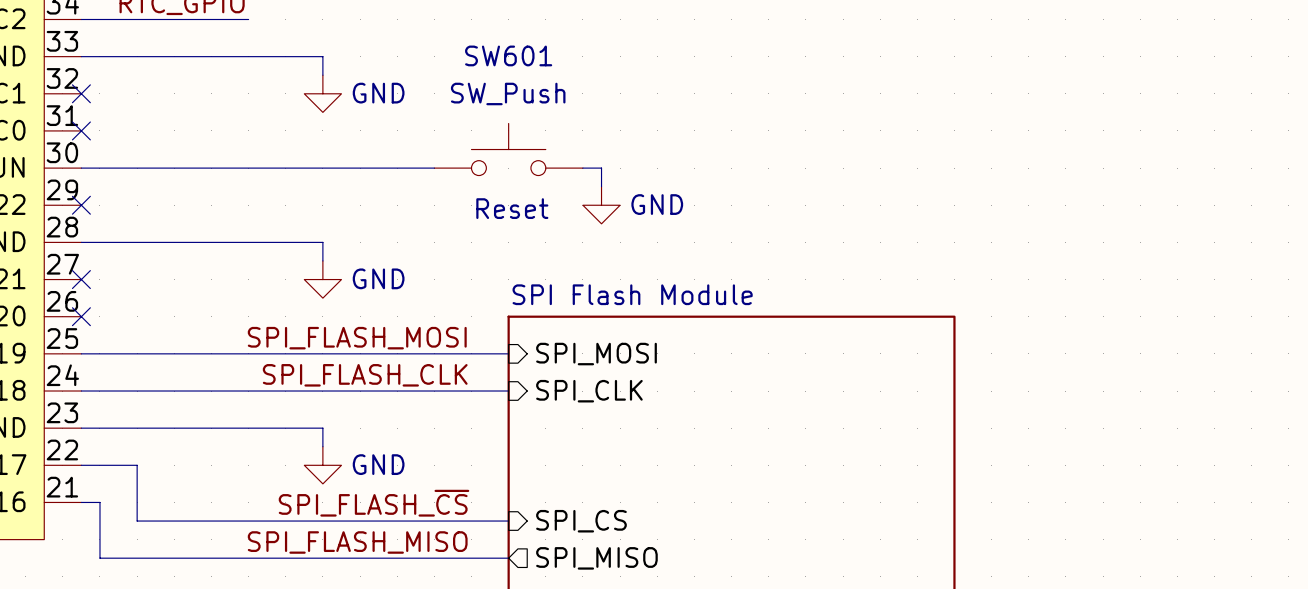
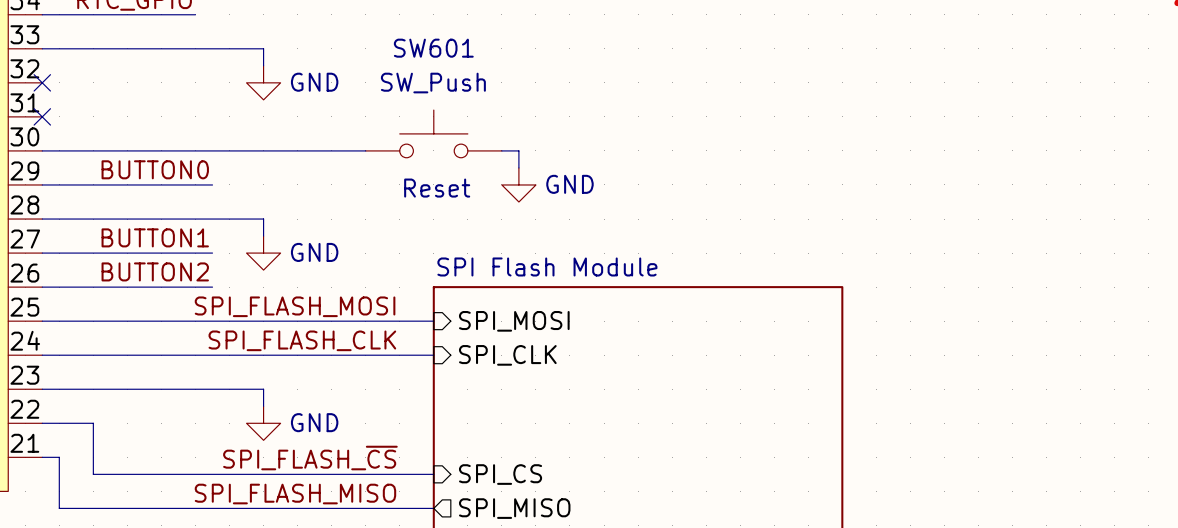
label: none -> BUTTON0 (155, 169)
wire: none -> (42, 184) (212, 184)
no-connect mark: (81, 205) -> none
label: none -> BUTTON1 (155, 237)
wire: none -> (42, 253) (212, 253)
no-connect mark: (81, 279) -> none
label: none -> BUTTON2 (155, 271)
wire: none -> (42, 287) (212, 287)
no-connect mark: (81, 316) -> none

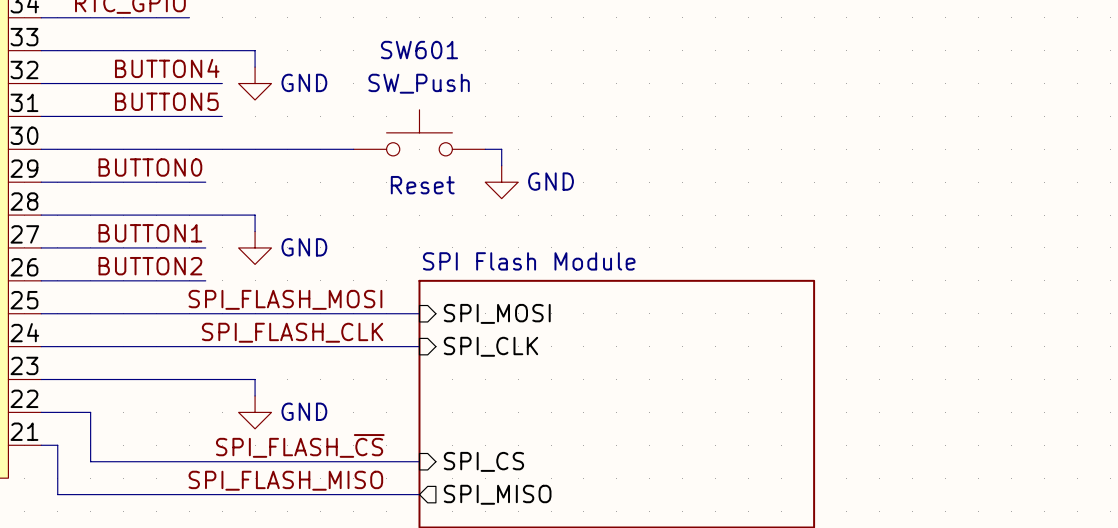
label: none -> BUTTON4 (167, 68)
wire: none -> (41, 83) (222, 83)
no-connect mark: (42, 82) -> none
label: none -> BUTTON5 (166, 101)
wire: none -> (41, 116) (222, 116)
no-connect mark: (42, 116) -> none

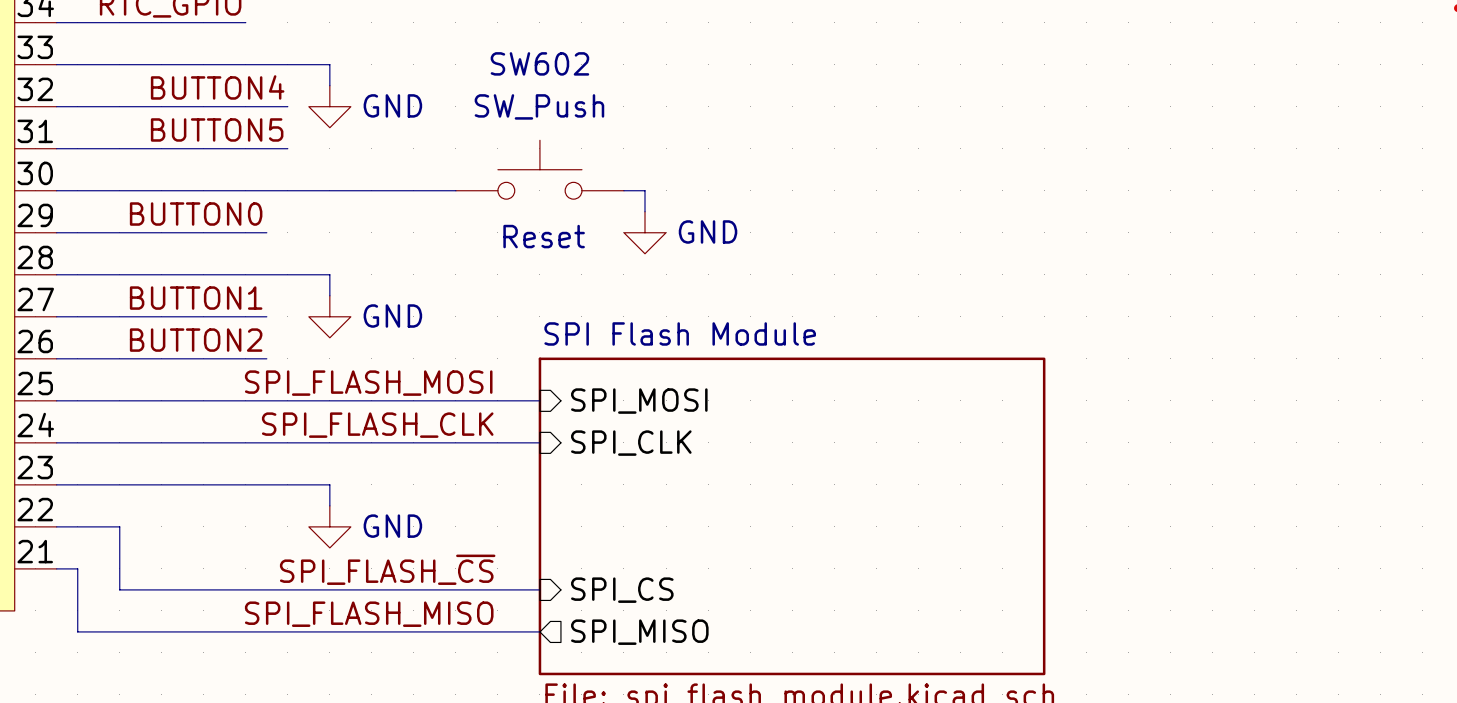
SW601 name: SW601 (419, 50) -> SW602 (539, 63)

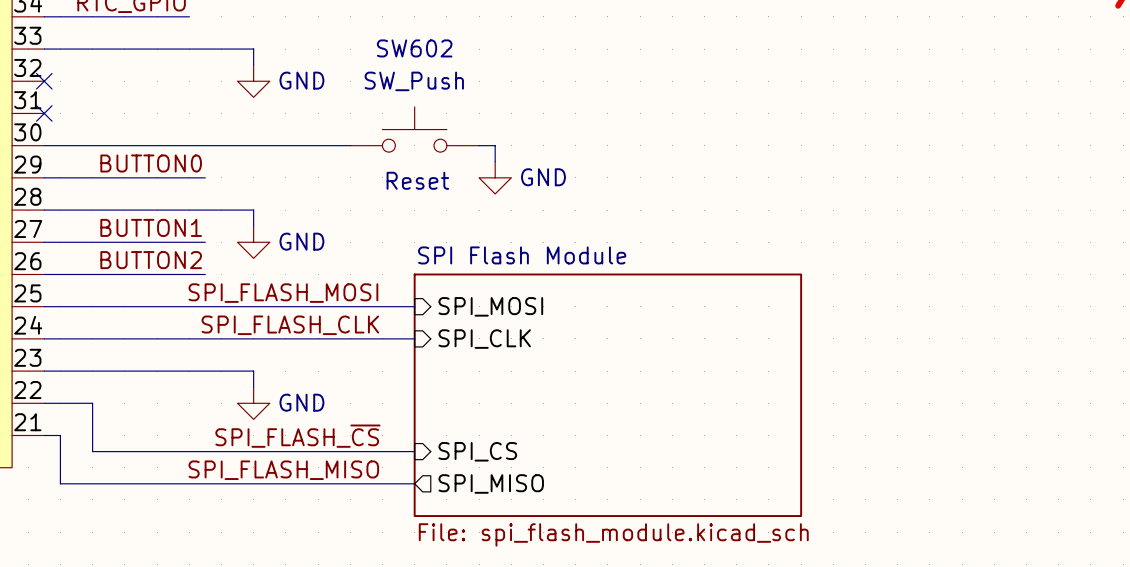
label: BUTTON4 (217, 87) -> none
wire: (56, 106) (287, 106) -> none
no-connect mark: none -> (44, 81)
label: BUTTON5 (217, 129) -> none
wire: (56, 148) (287, 148) -> none
no-connect mark: none -> (44, 113)

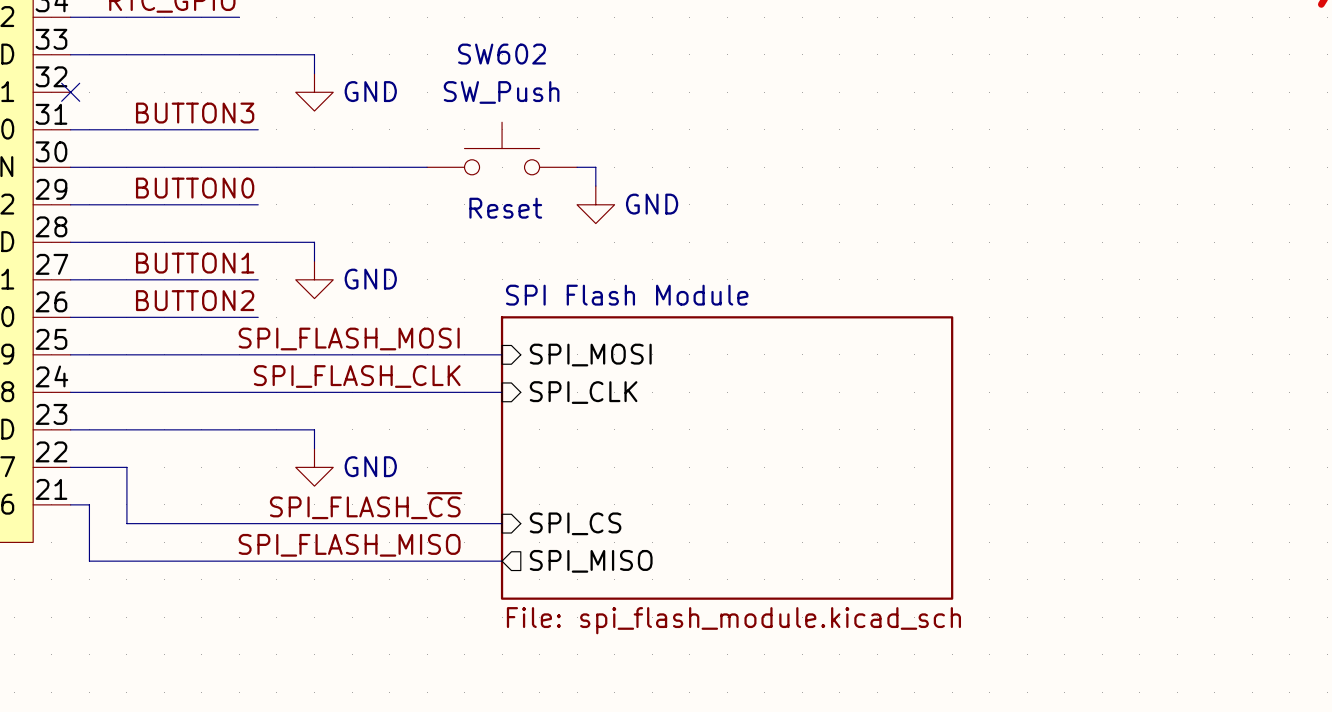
label: none -> BUTTON3 (195, 113)
wire: none -> (70, 129) (258, 129)
no-connect mark: (44, 113) -> none

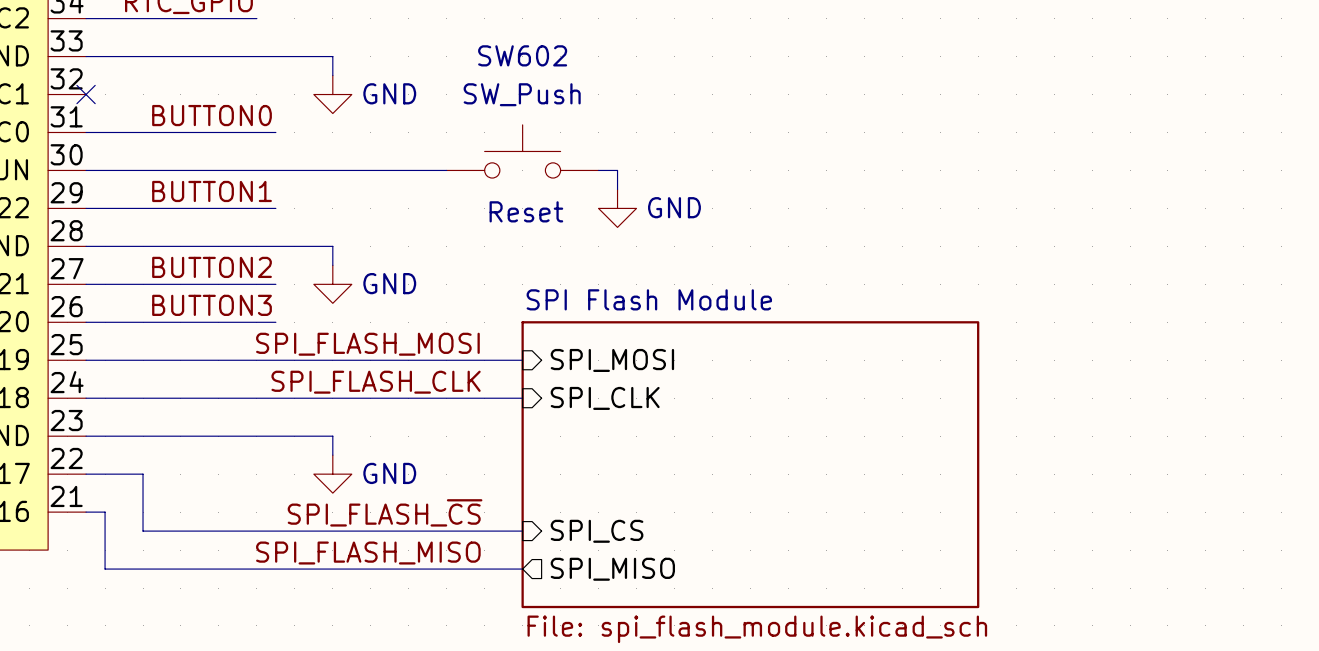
label: BUTTON3 (195, 113) -> BUTTON0 (212, 115)
label: BUTTON0 (195, 188) -> BUTTON1 (212, 191)
label: BUTTON1 (195, 263) -> BUTTON2 (212, 267)
label: BUTTON2 (195, 300) -> BUTTON3 (212, 305)

